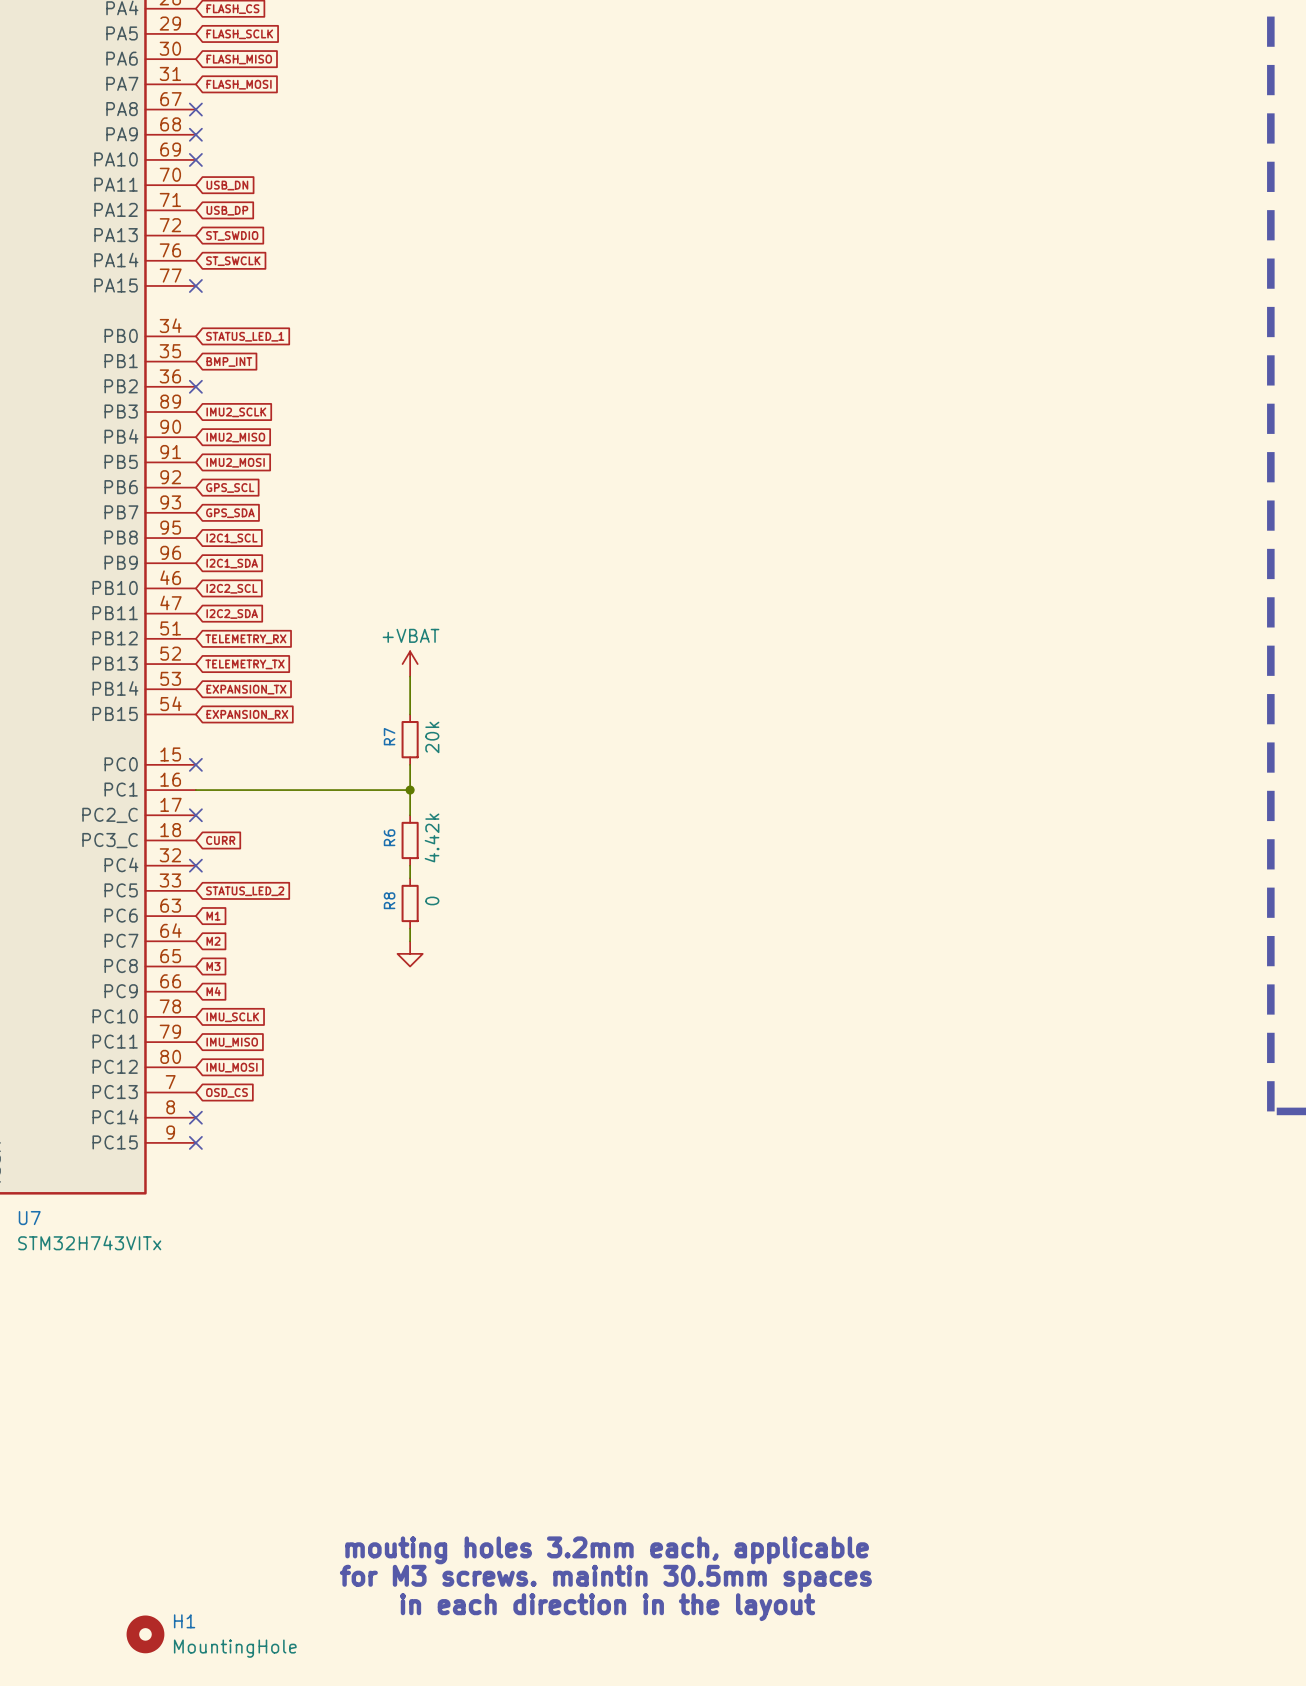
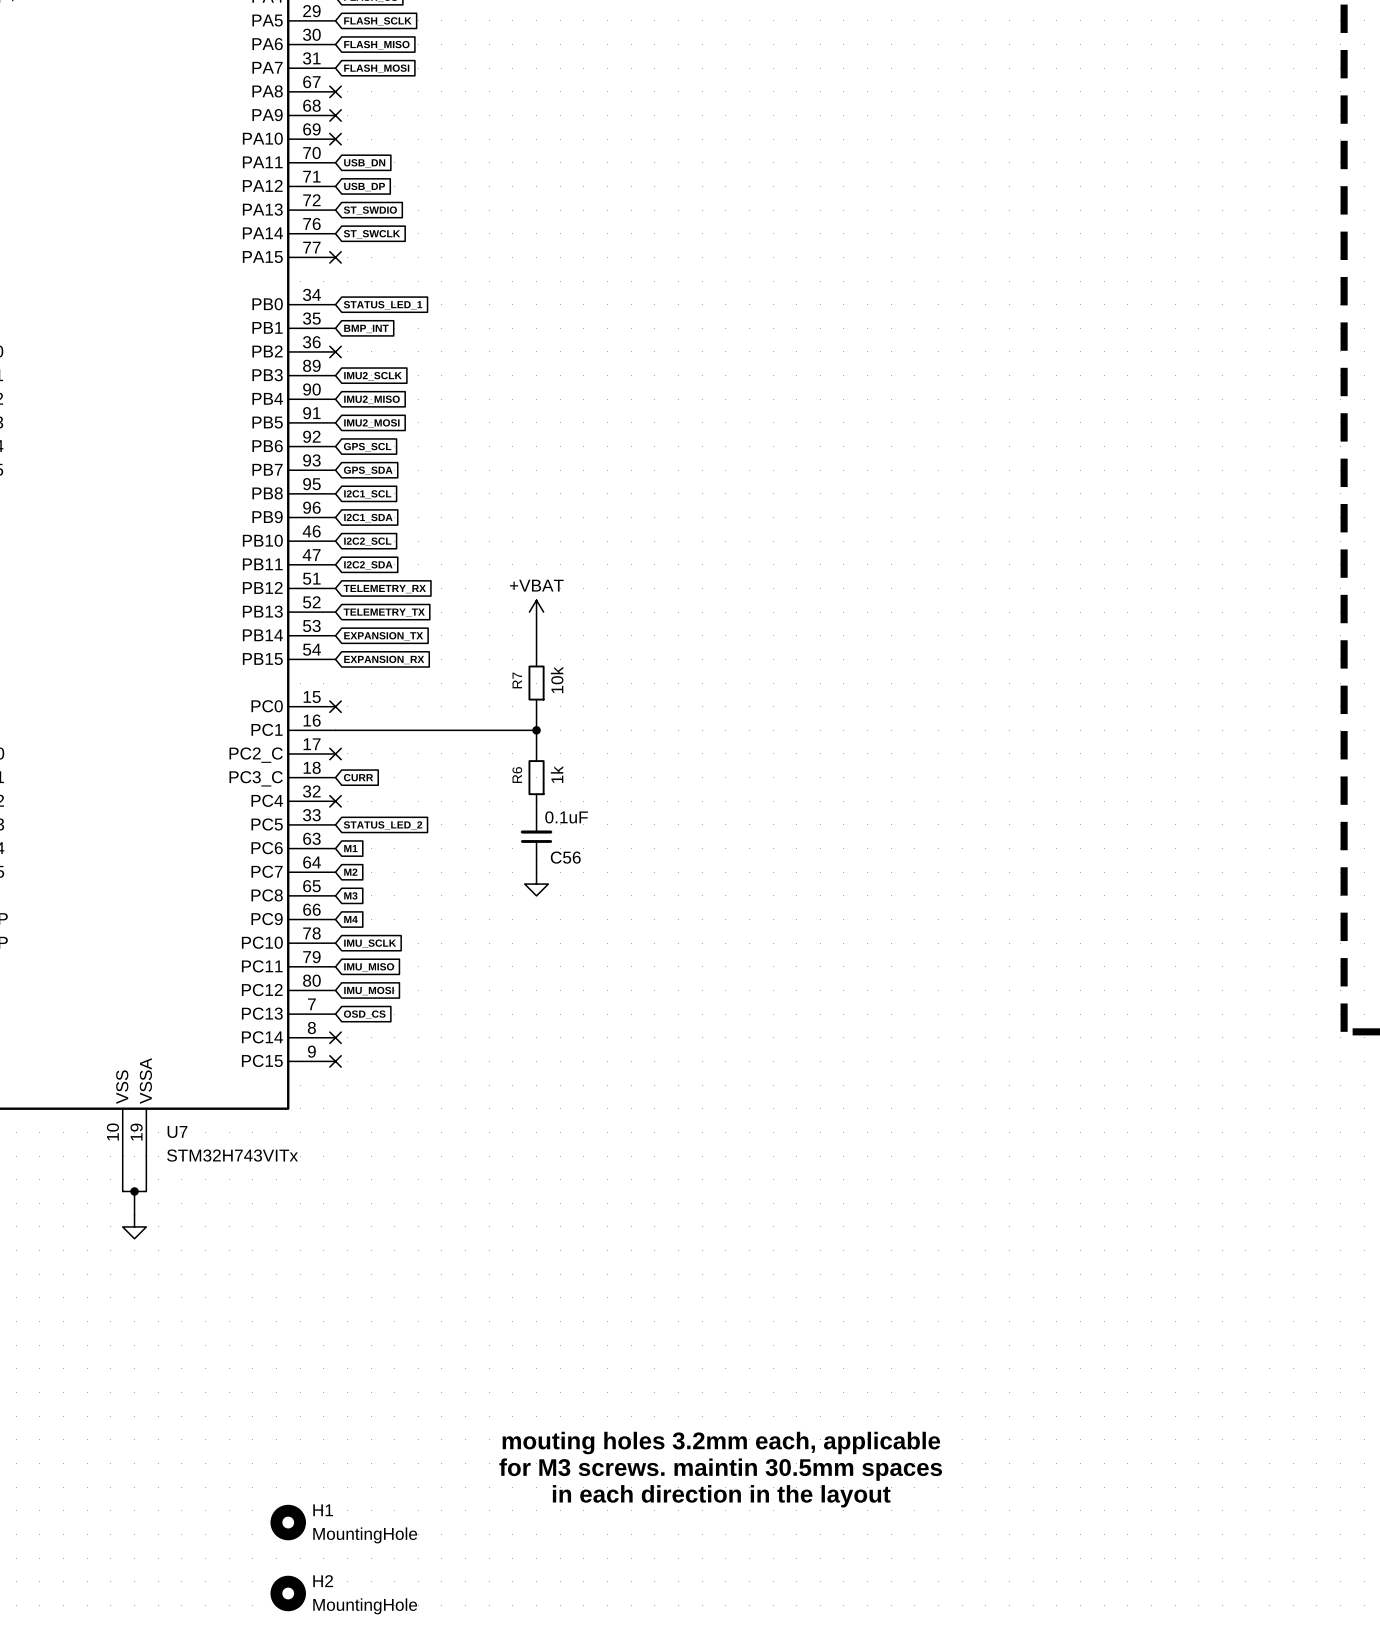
R7 value: 20k (432, 737) -> 10k (557, 680)
R6 value: 4.42k (432, 837) -> 1k (557, 774)
R8: 0 (410, 903) -> none
C56: none -> 0.1uF (536, 836)

